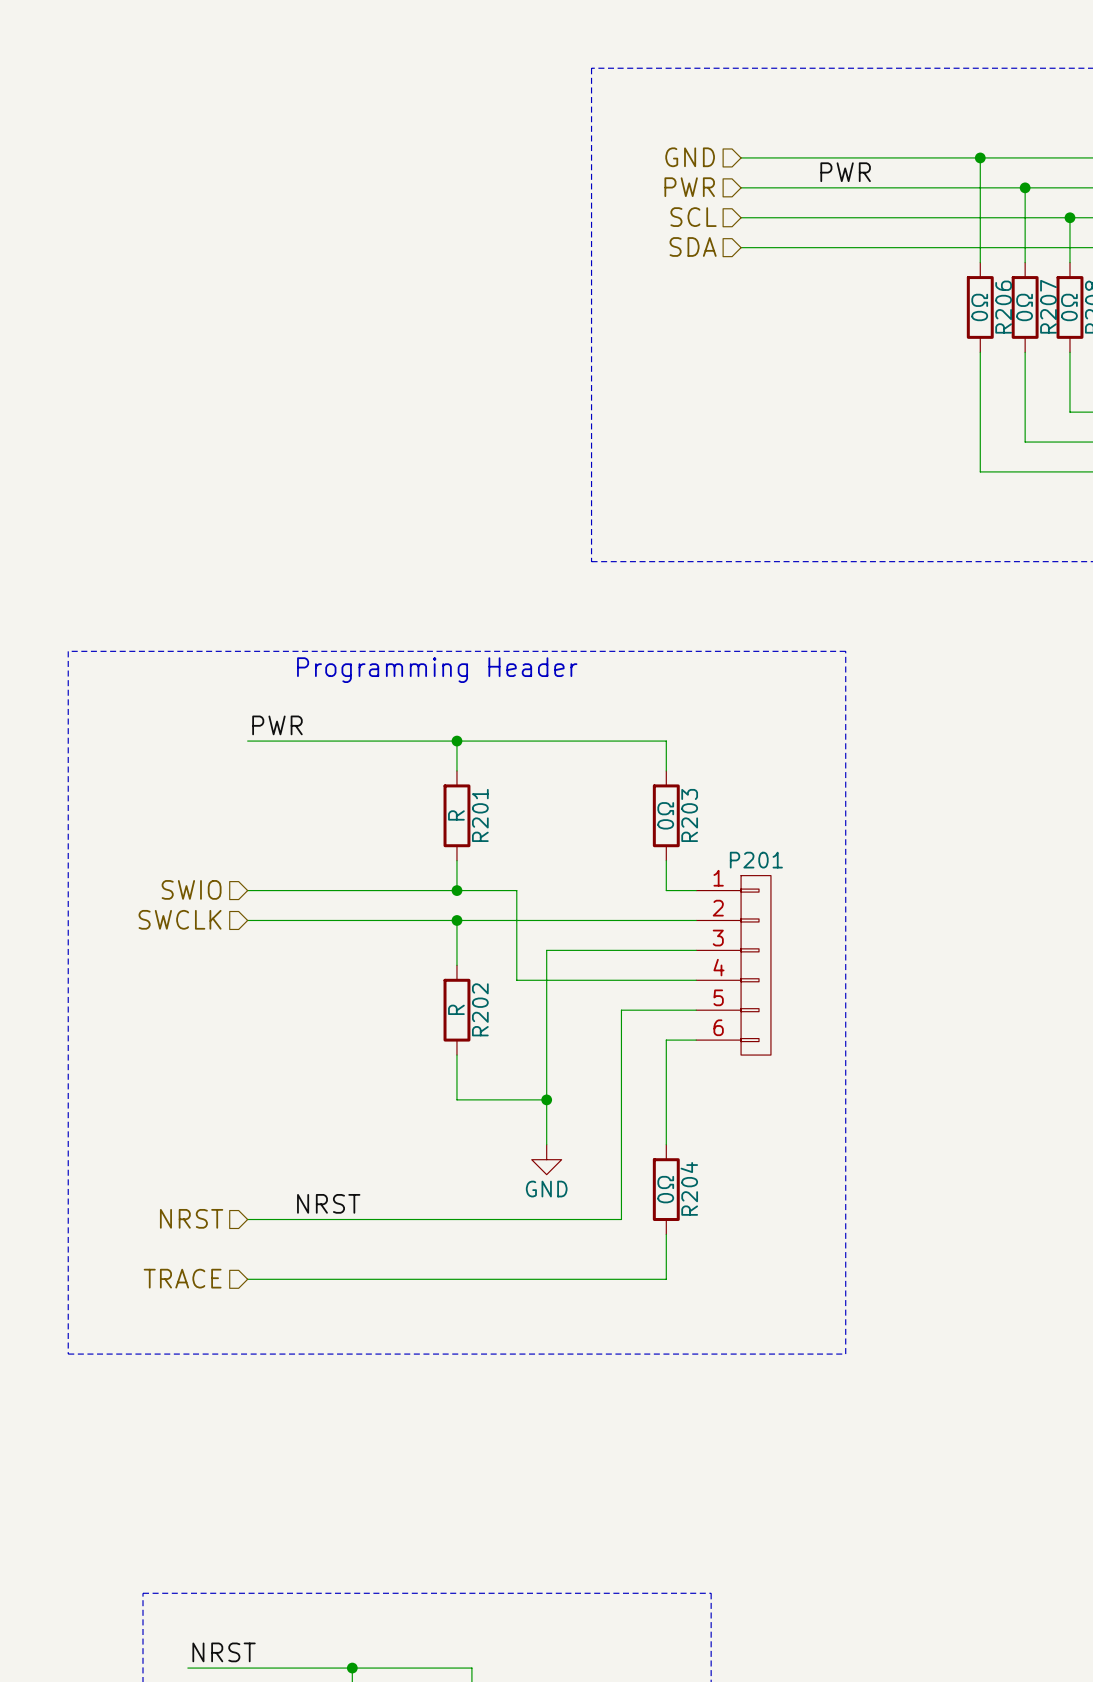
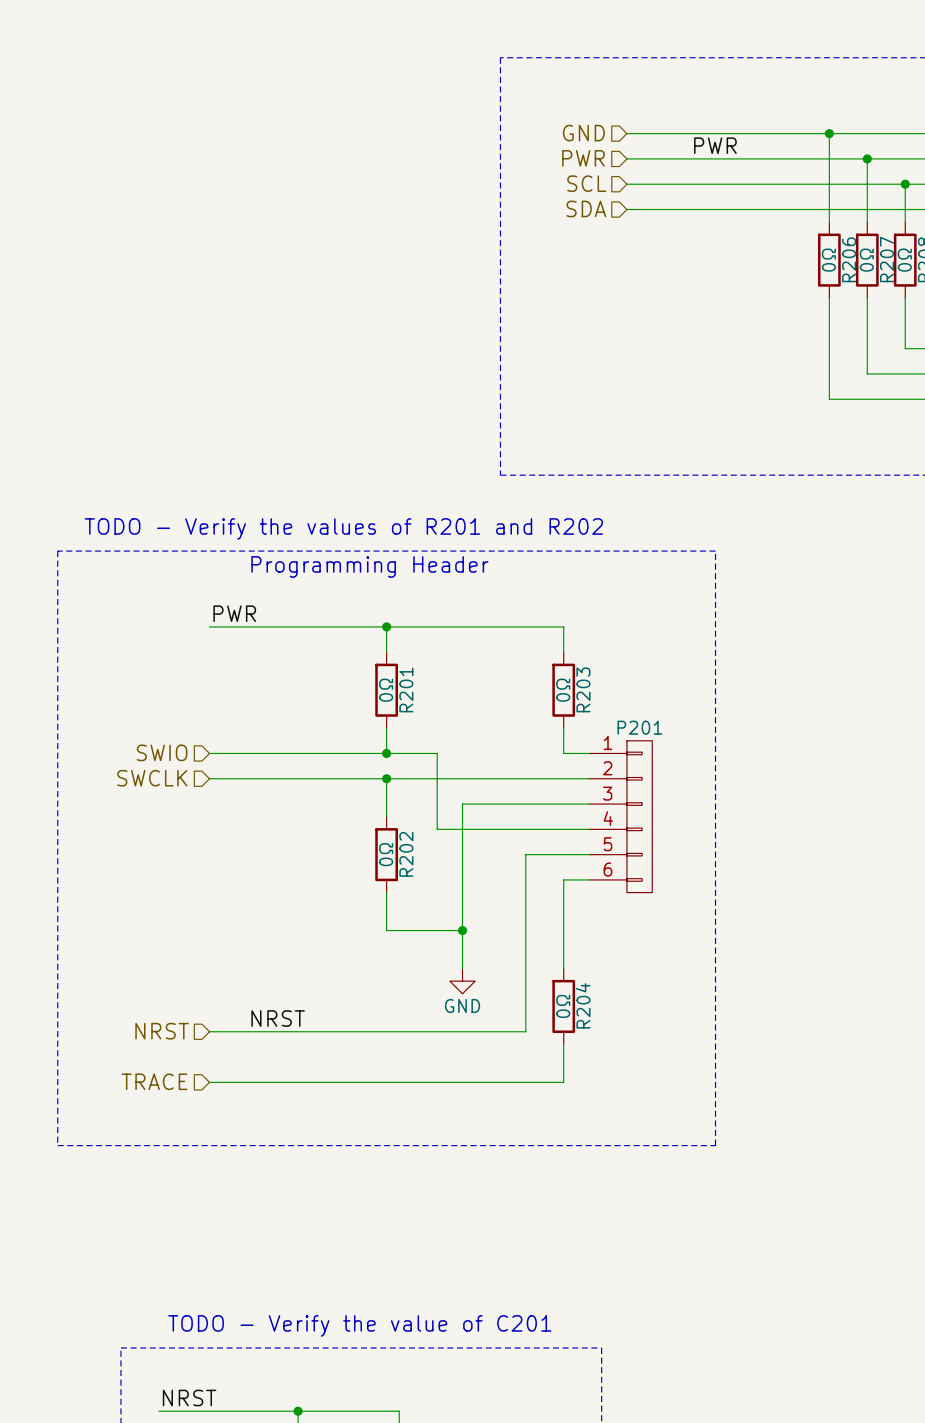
text: none -> TODO - Verify the values of R201 and R202 (343, 529)
R201 value: R (456, 815) -> 0Ω (386, 690)
R202 value: R (456, 1009) -> 0Ω (386, 854)
text: none -> TODO - Verify the value of C201 (359, 1325)

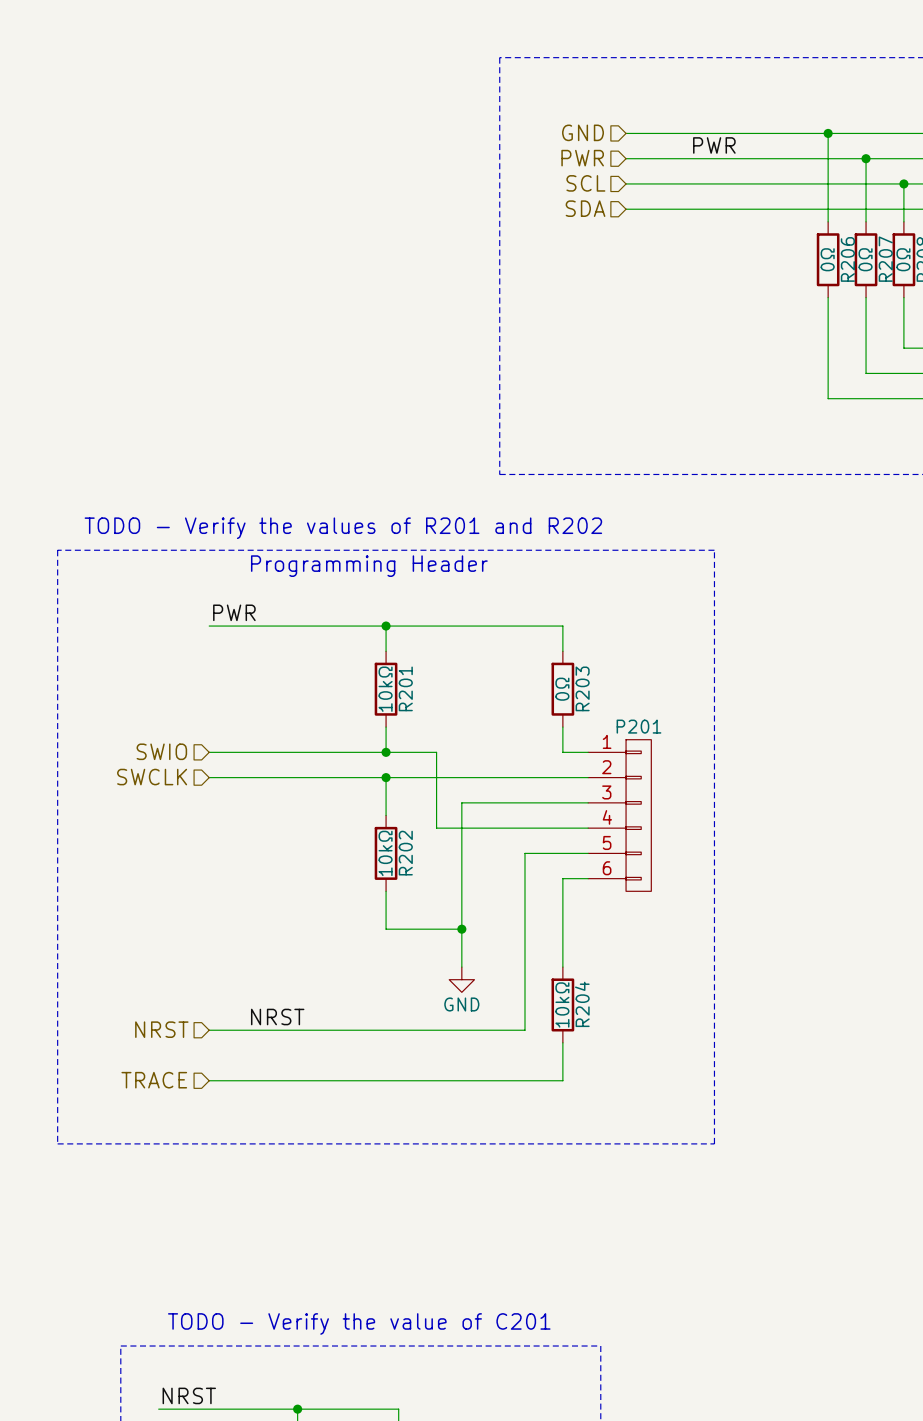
R201 value: 0Ω (386, 690) -> 10kΩ (385, 689)
R202 value: 0Ω (386, 854) -> 10kΩ (385, 853)
R204 value: 0Ω (563, 1006) -> 10kΩ (562, 1004)

